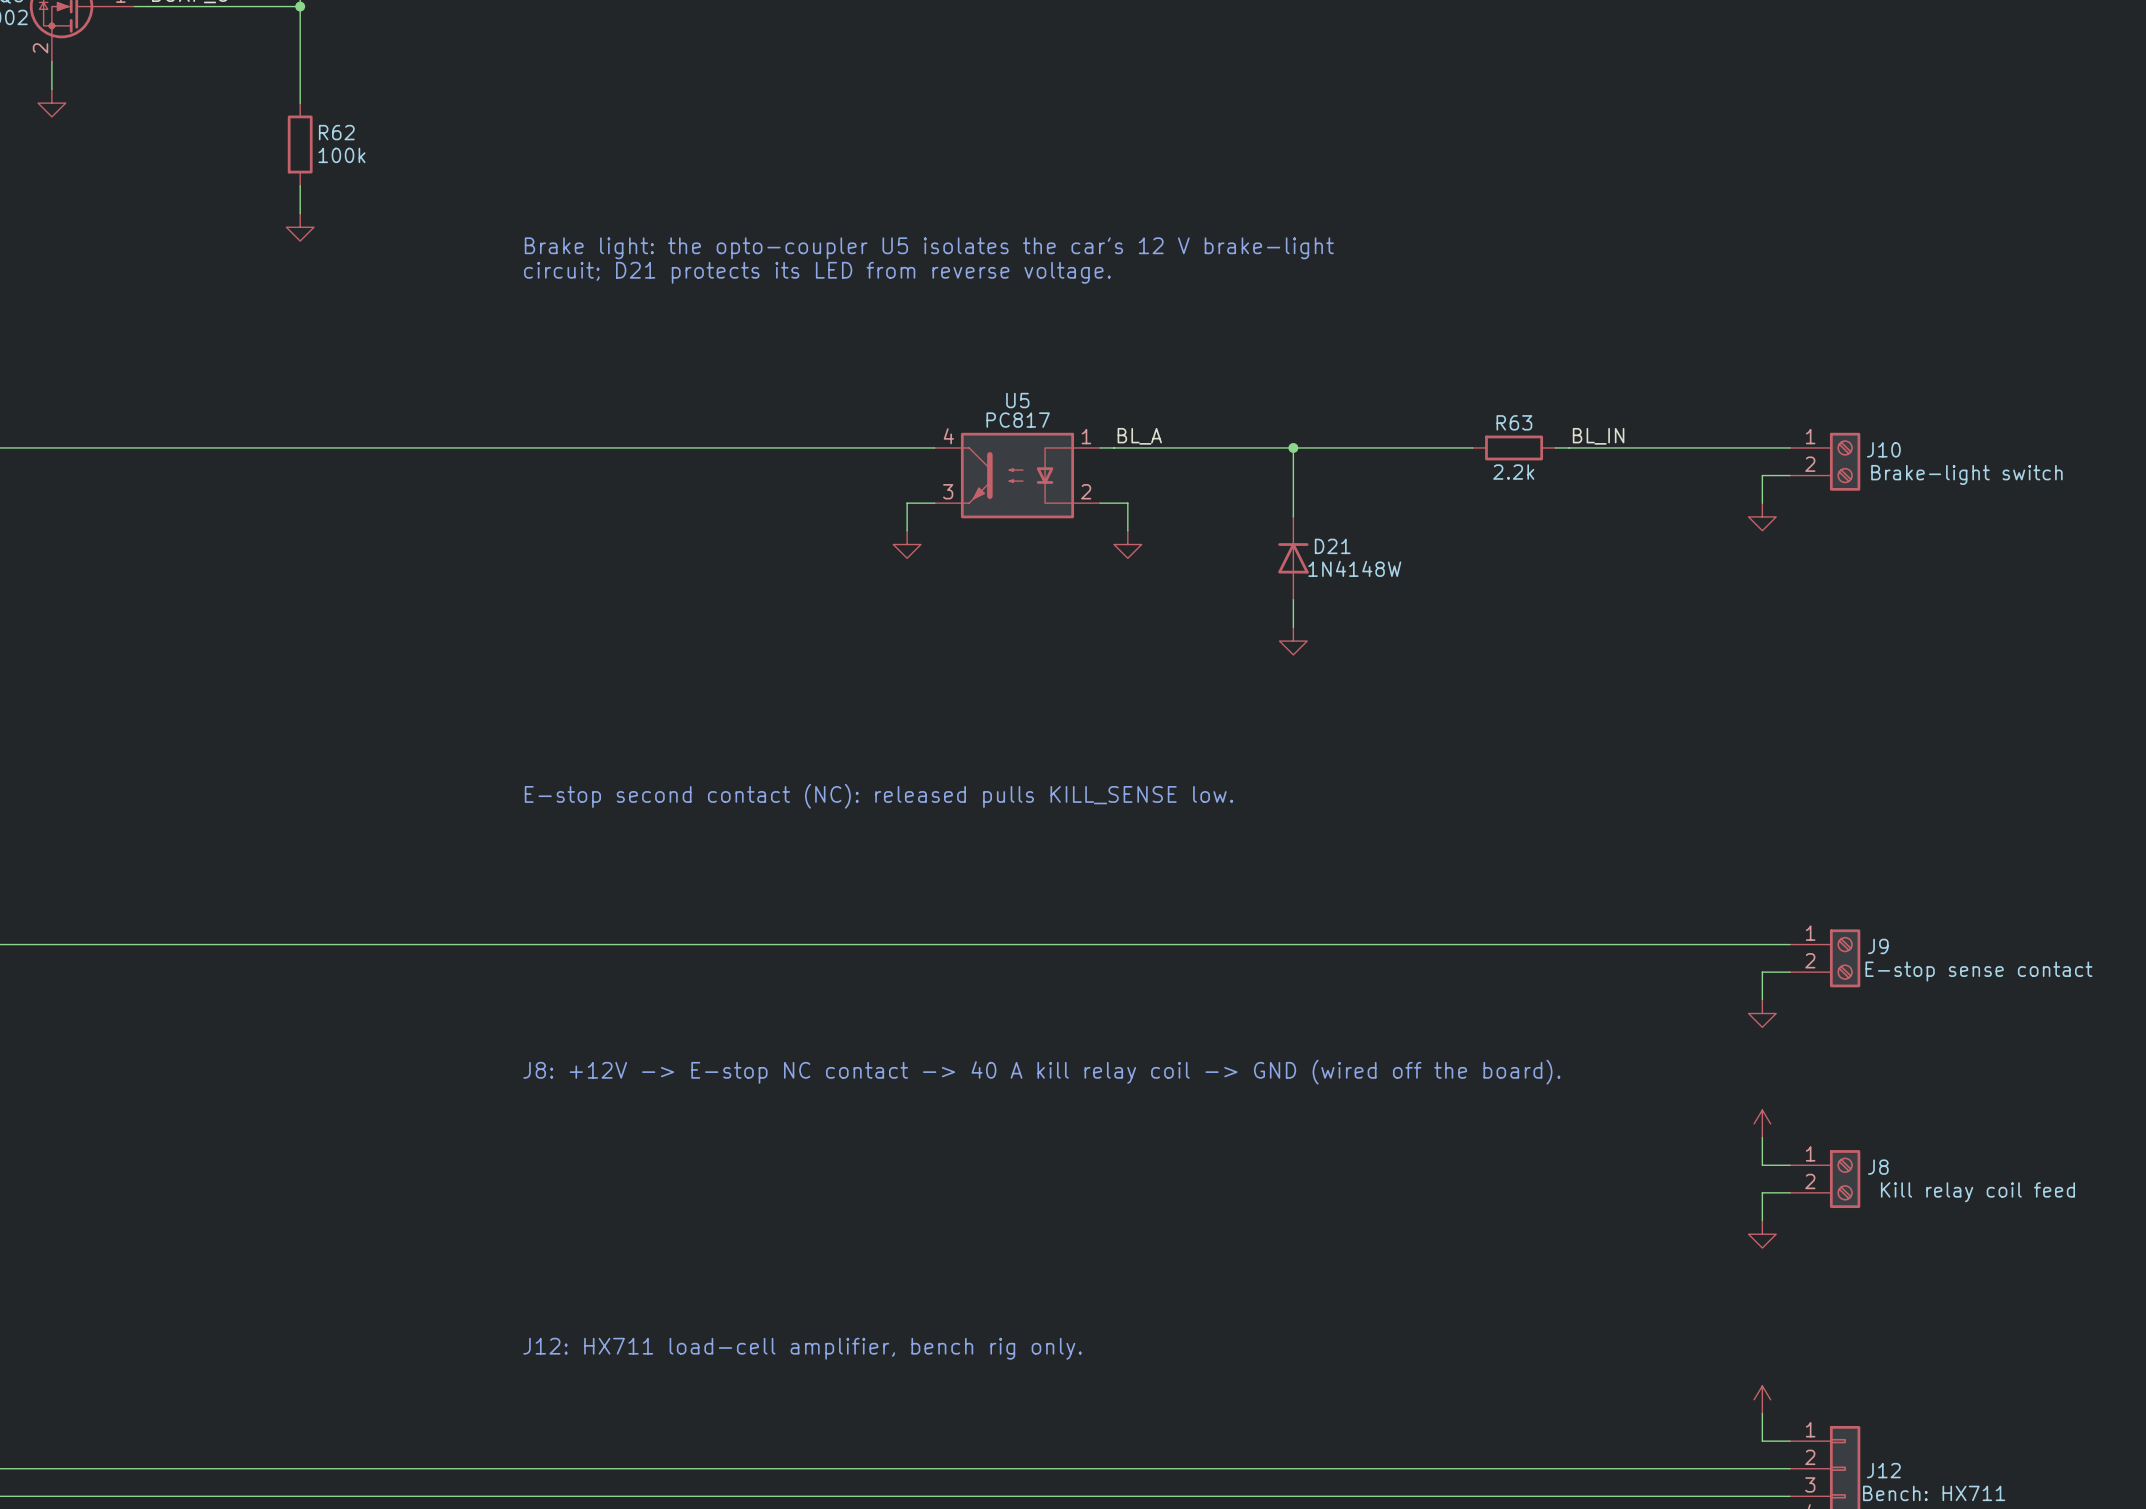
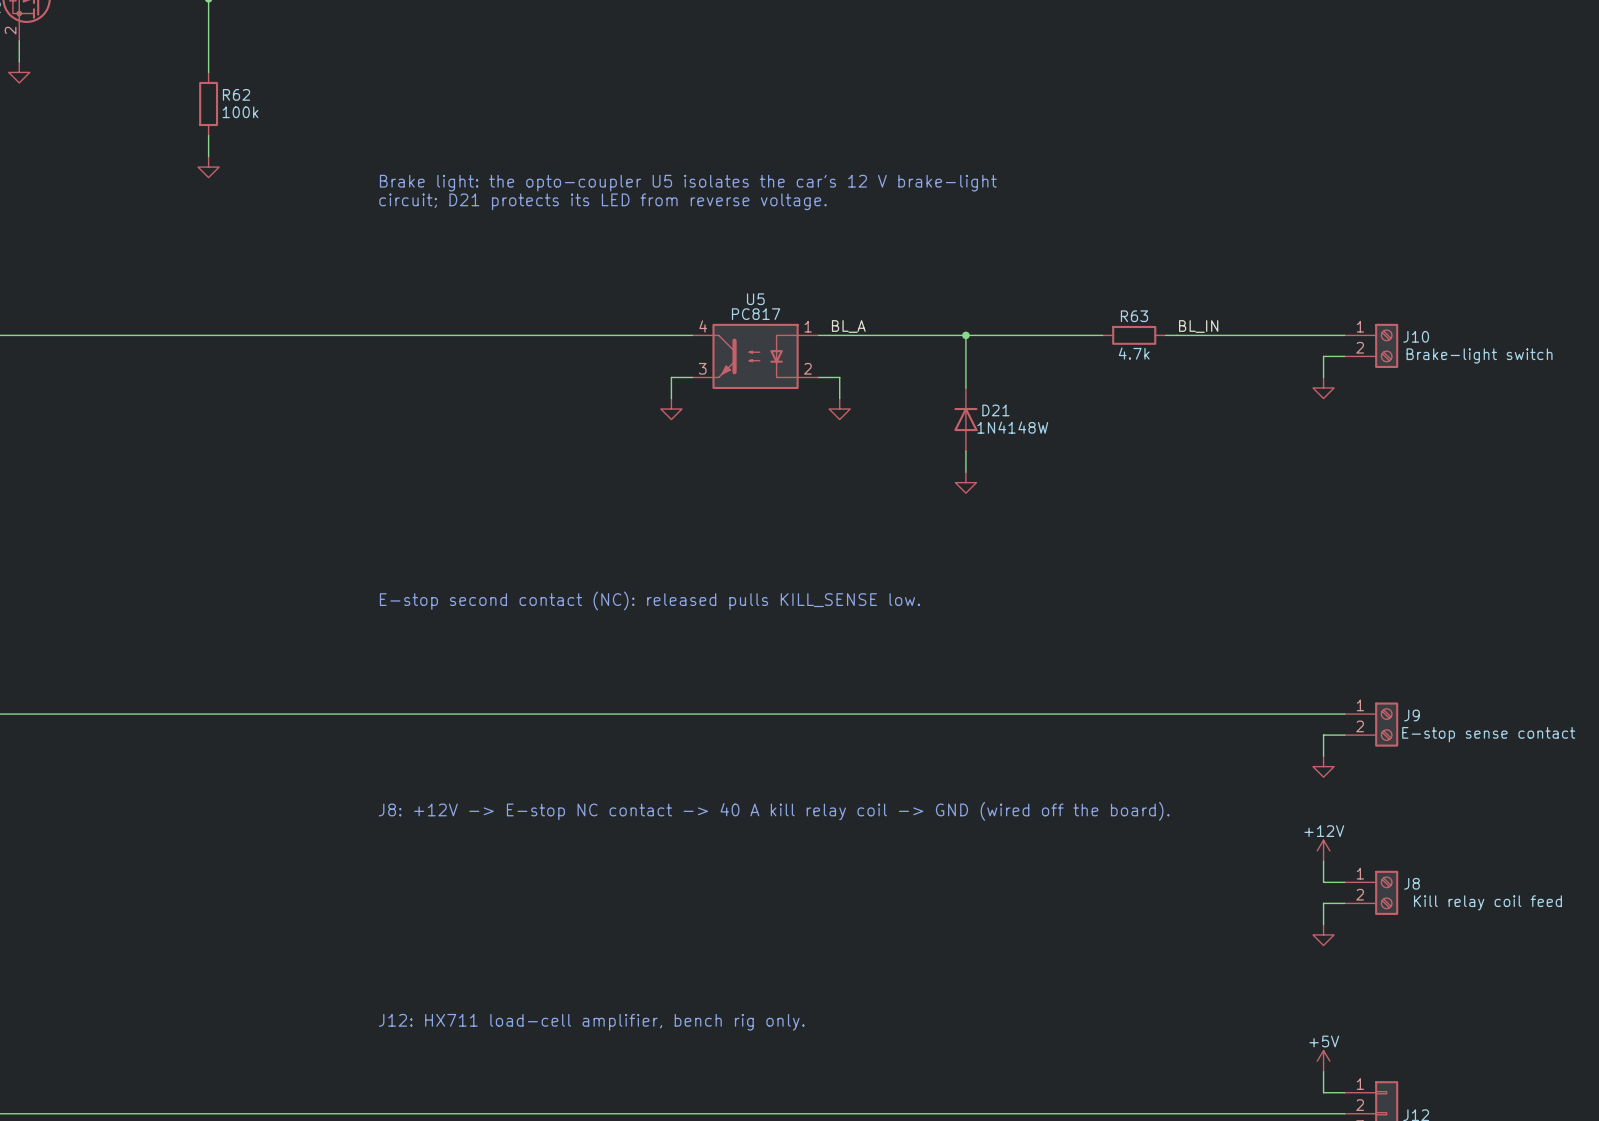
R63 value: 2.2k (1513, 472) -> 4.7k (1134, 353)
power symbol text: none -> +12V (1324, 831)
power symbol text: none -> +5V (1324, 1041)

